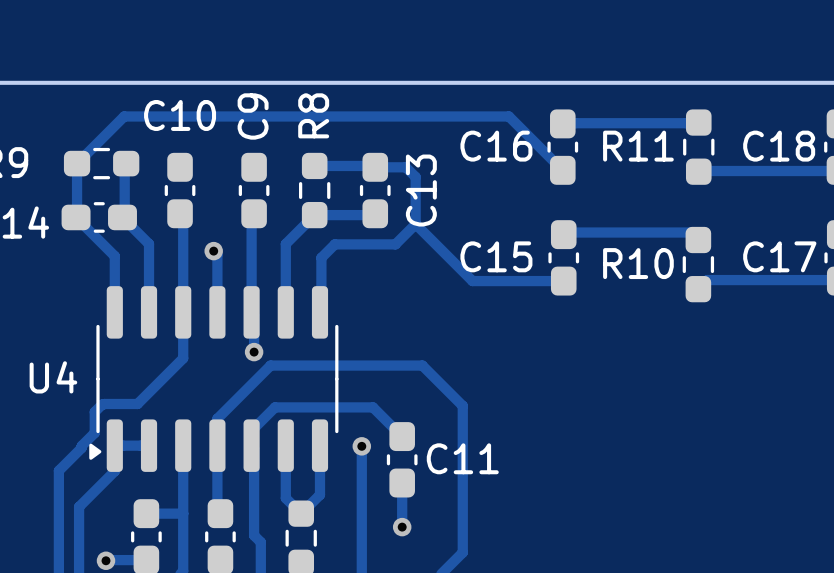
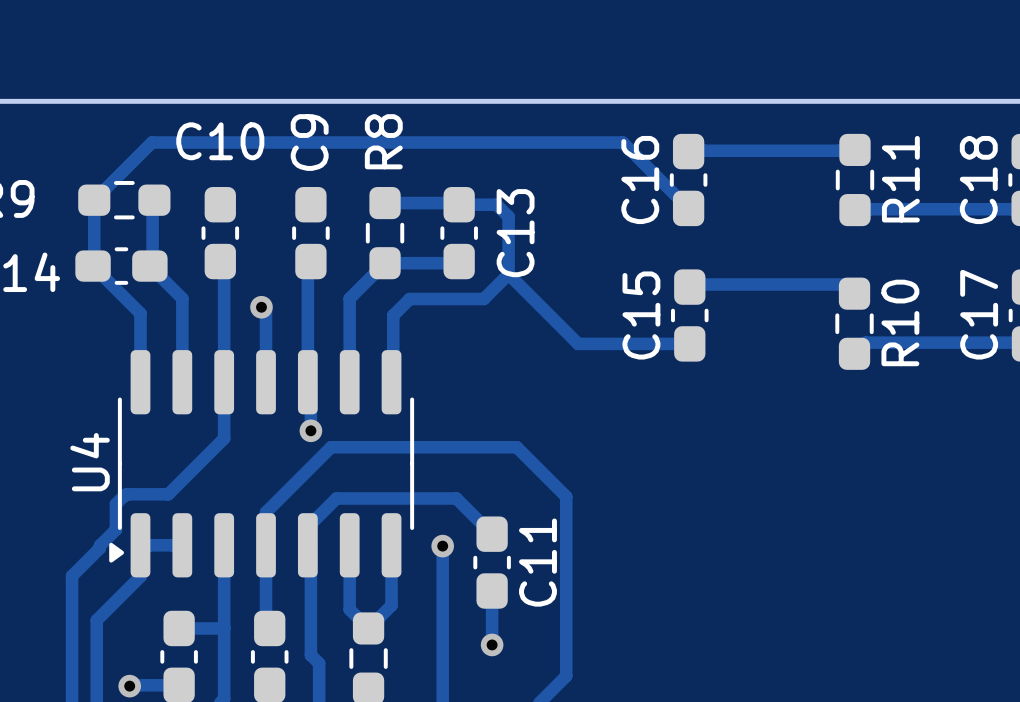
C16 name rotation: 0° (496, 146) -> 90° counterclockwise (640, 180)
R11 name rotation: 0° (638, 146) -> 90° counterclockwise (900, 179)
R11 name position: R11 (638, 146) -> R11 (900, 179)
C18 name rotation: 0° (779, 146) -> 90° counterclockwise (978, 180)
C15 name rotation: 0° (496, 256) -> 90° counterclockwise (641, 315)
C17 name rotation: 0° (779, 256) -> 90° counterclockwise (979, 314)
R10 name rotation: 0° (638, 263) -> 90° counterclockwise (900, 322)
R10 name position: R10 (638, 263) -> R10 (900, 322)
U4 name rotation: 0° (53, 377) -> 90° counterclockwise (90, 462)
C11 name rotation: 0° (462, 458) -> 90° counterclockwise (537, 562)

